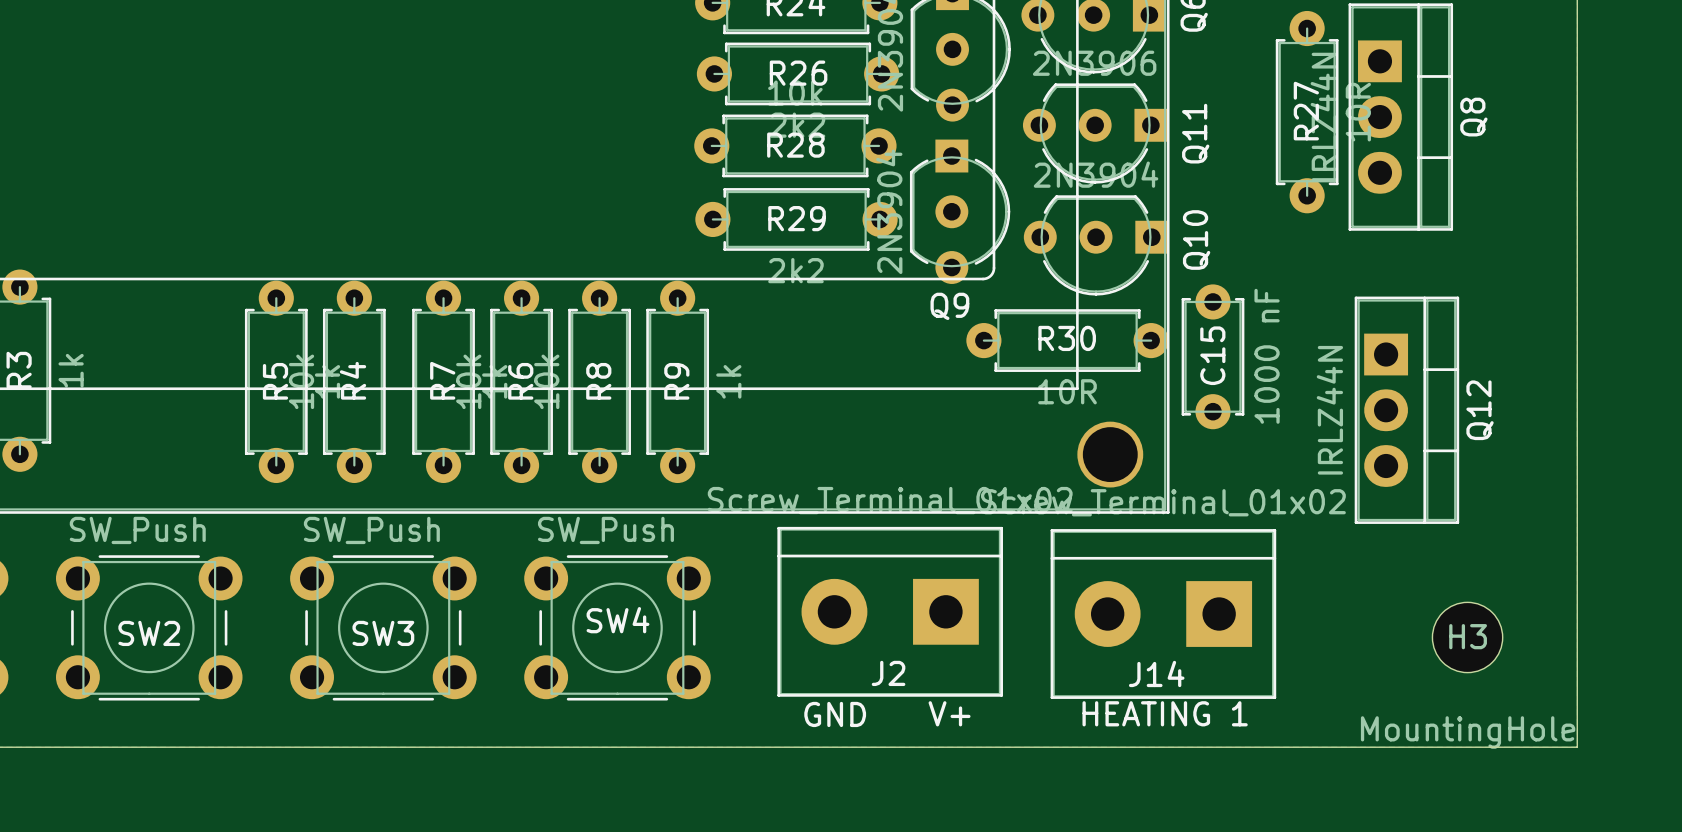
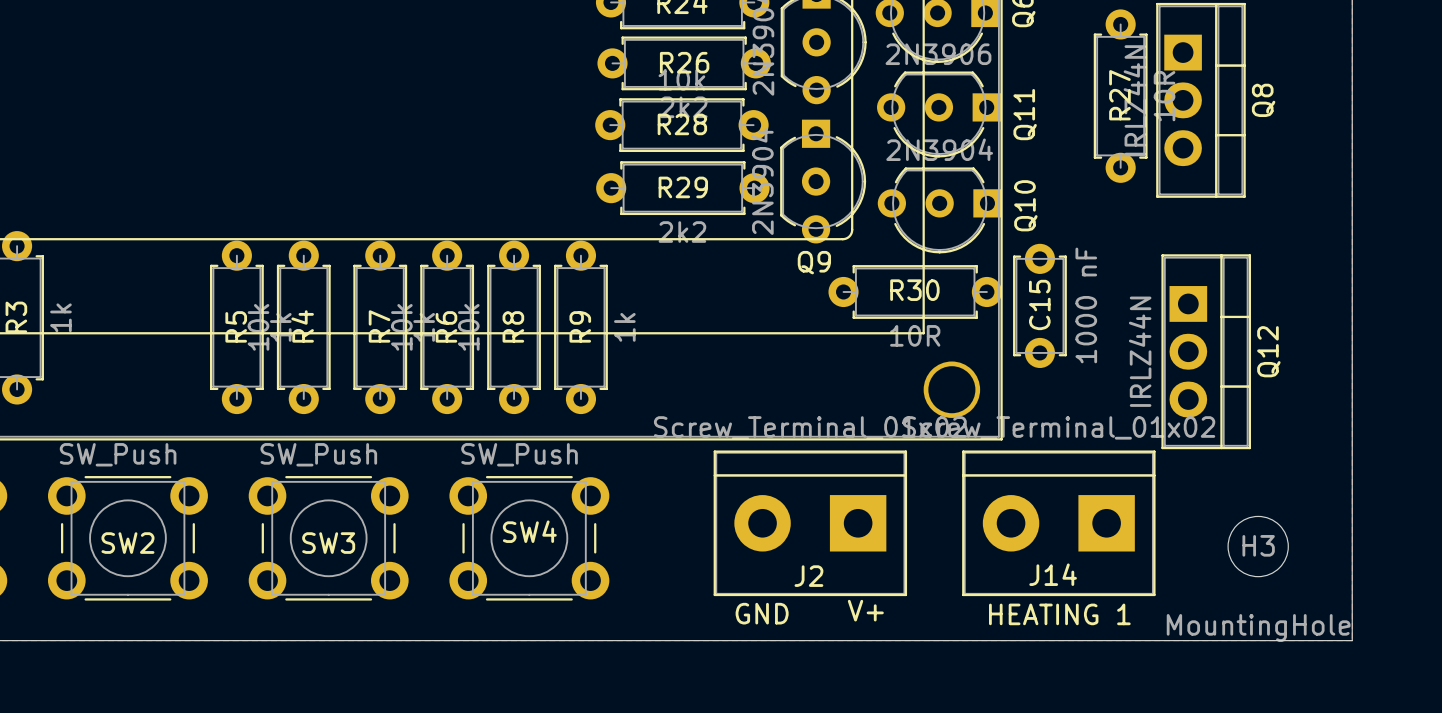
J2 position: (890, 611) -> (810, 523)
J14 position: (1163, 614) -> (1058, 523)
text position: V+ (949, 713) -> V+ (865, 610)
text position: HEATING 1 (1165, 713) -> HEATING 1 (1059, 614)
text position: GND (835, 714) -> GND (762, 613)

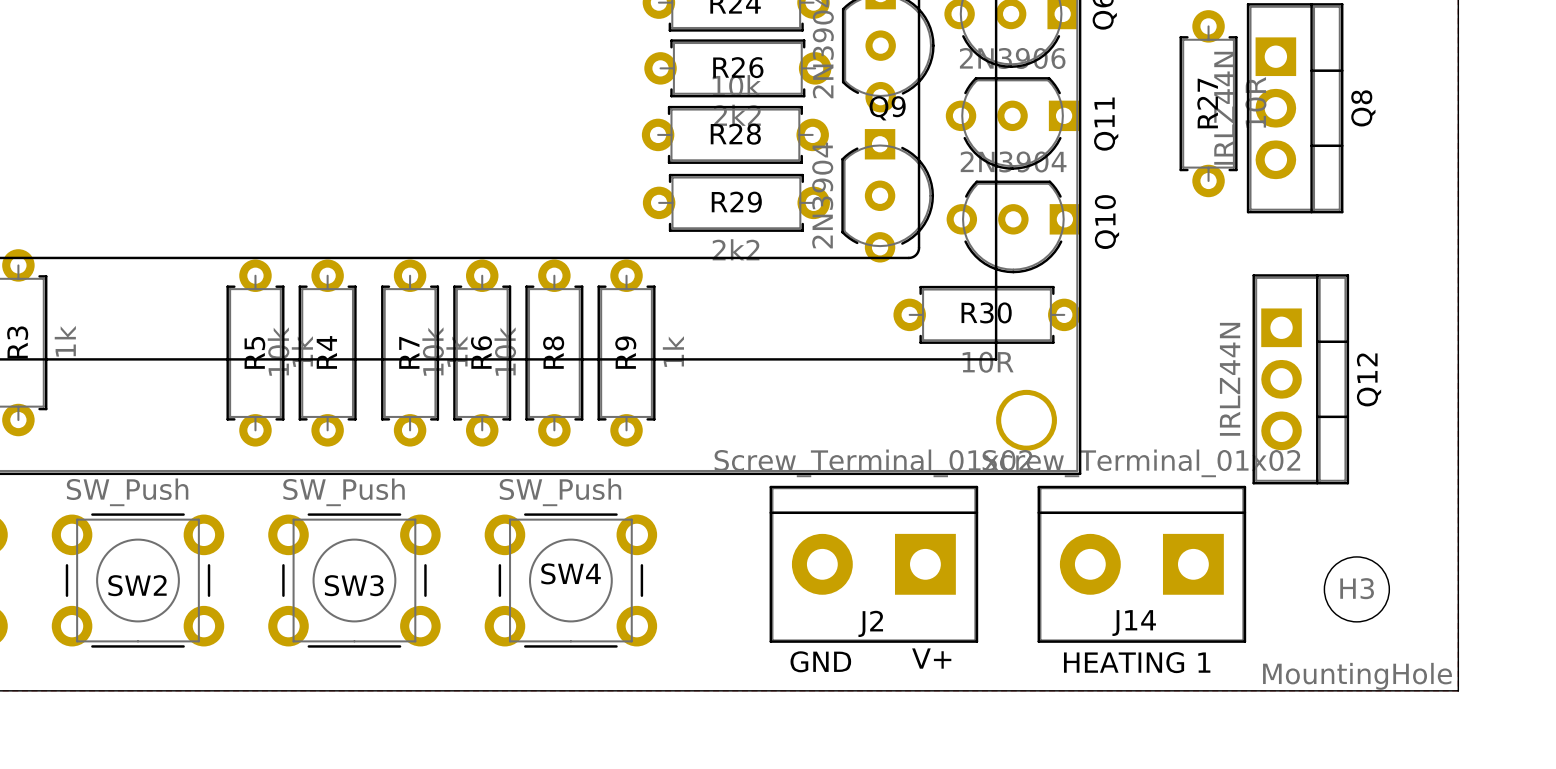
Q9 name position: Q9 (814, 262) -> Q9 (887, 108)
C15: 1000 nF (1039, 305) -> none

